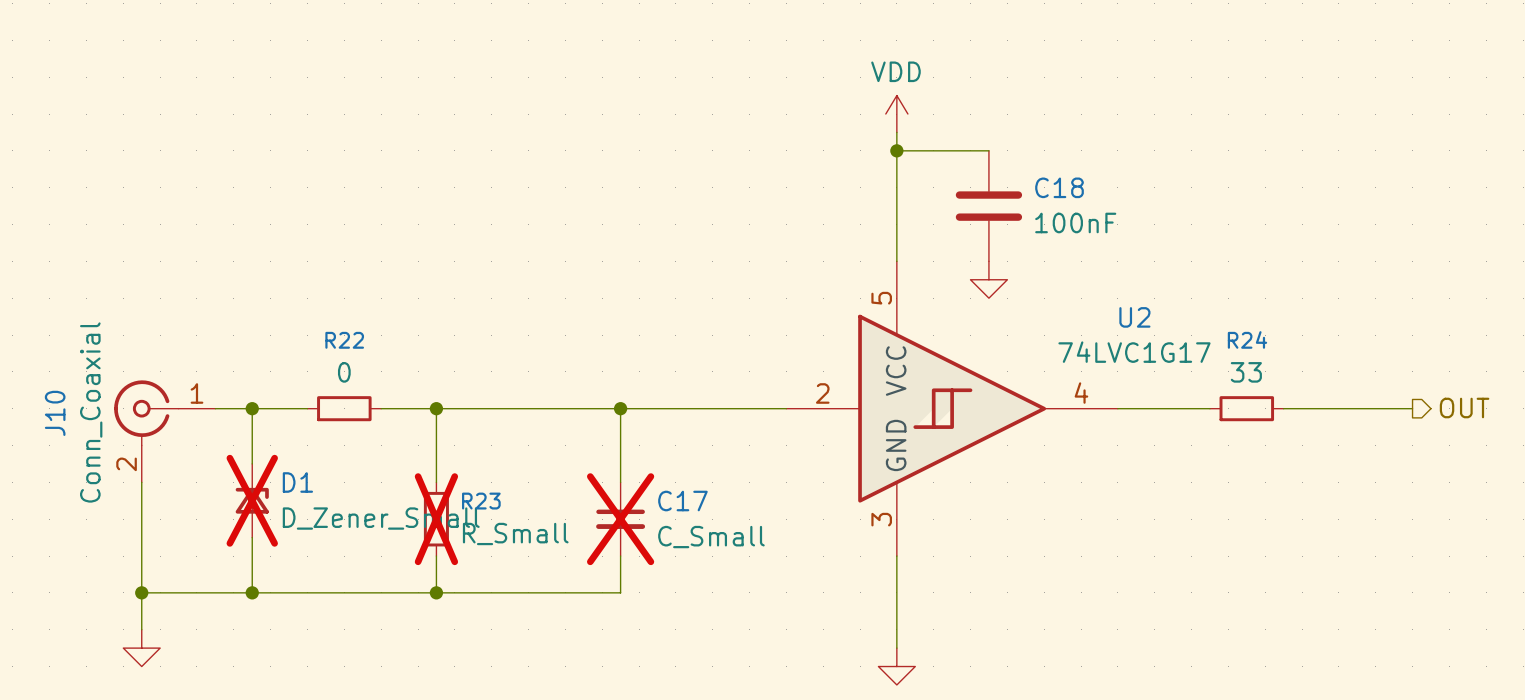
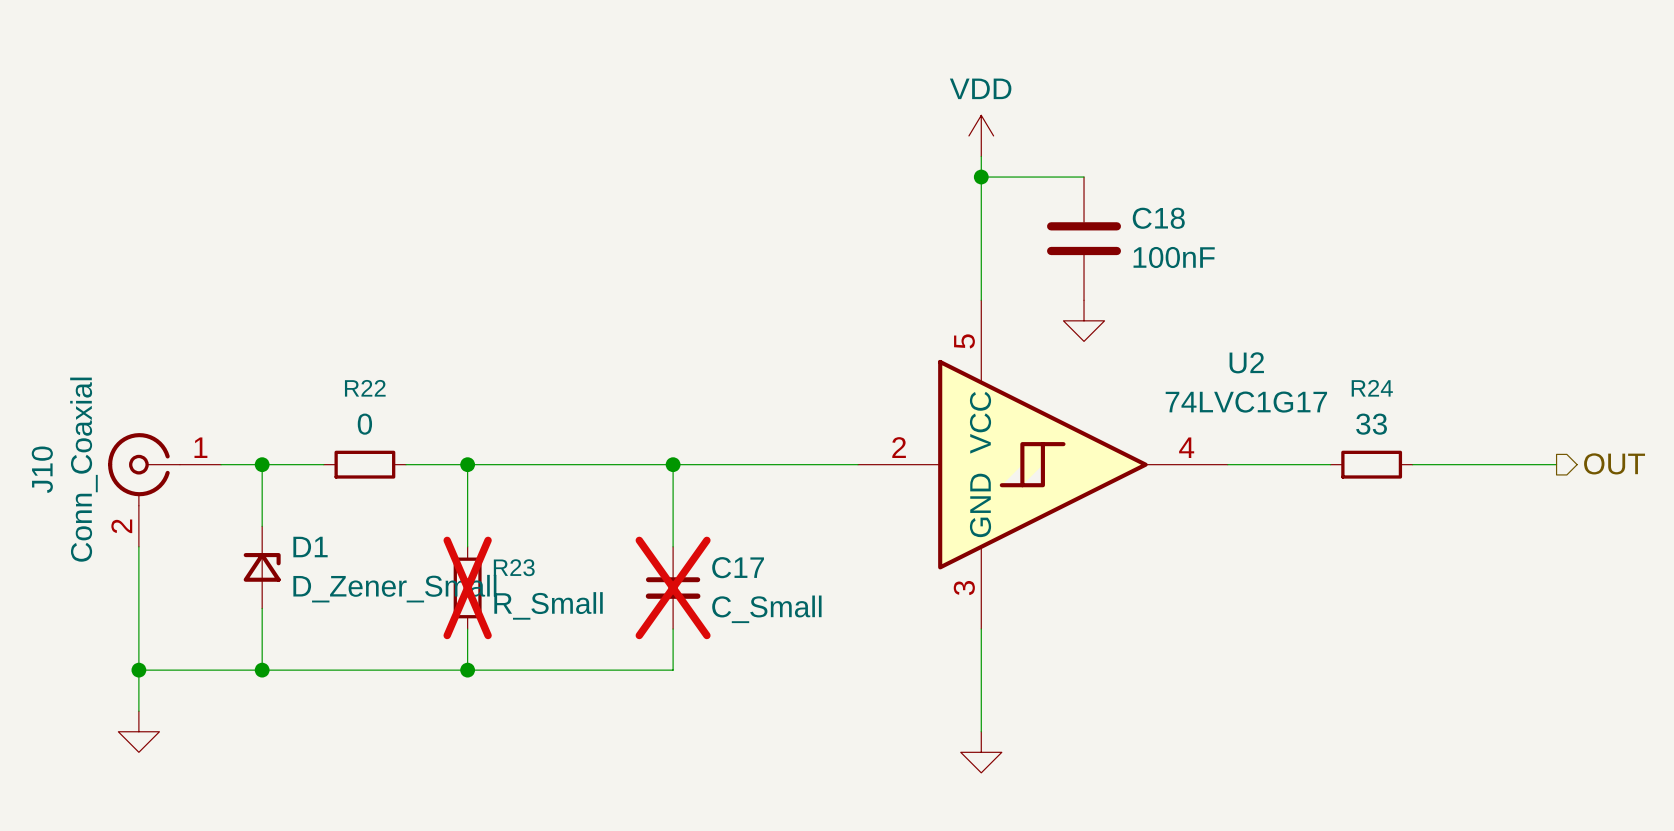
D1 do-not-place cross: (252, 500) -> none

